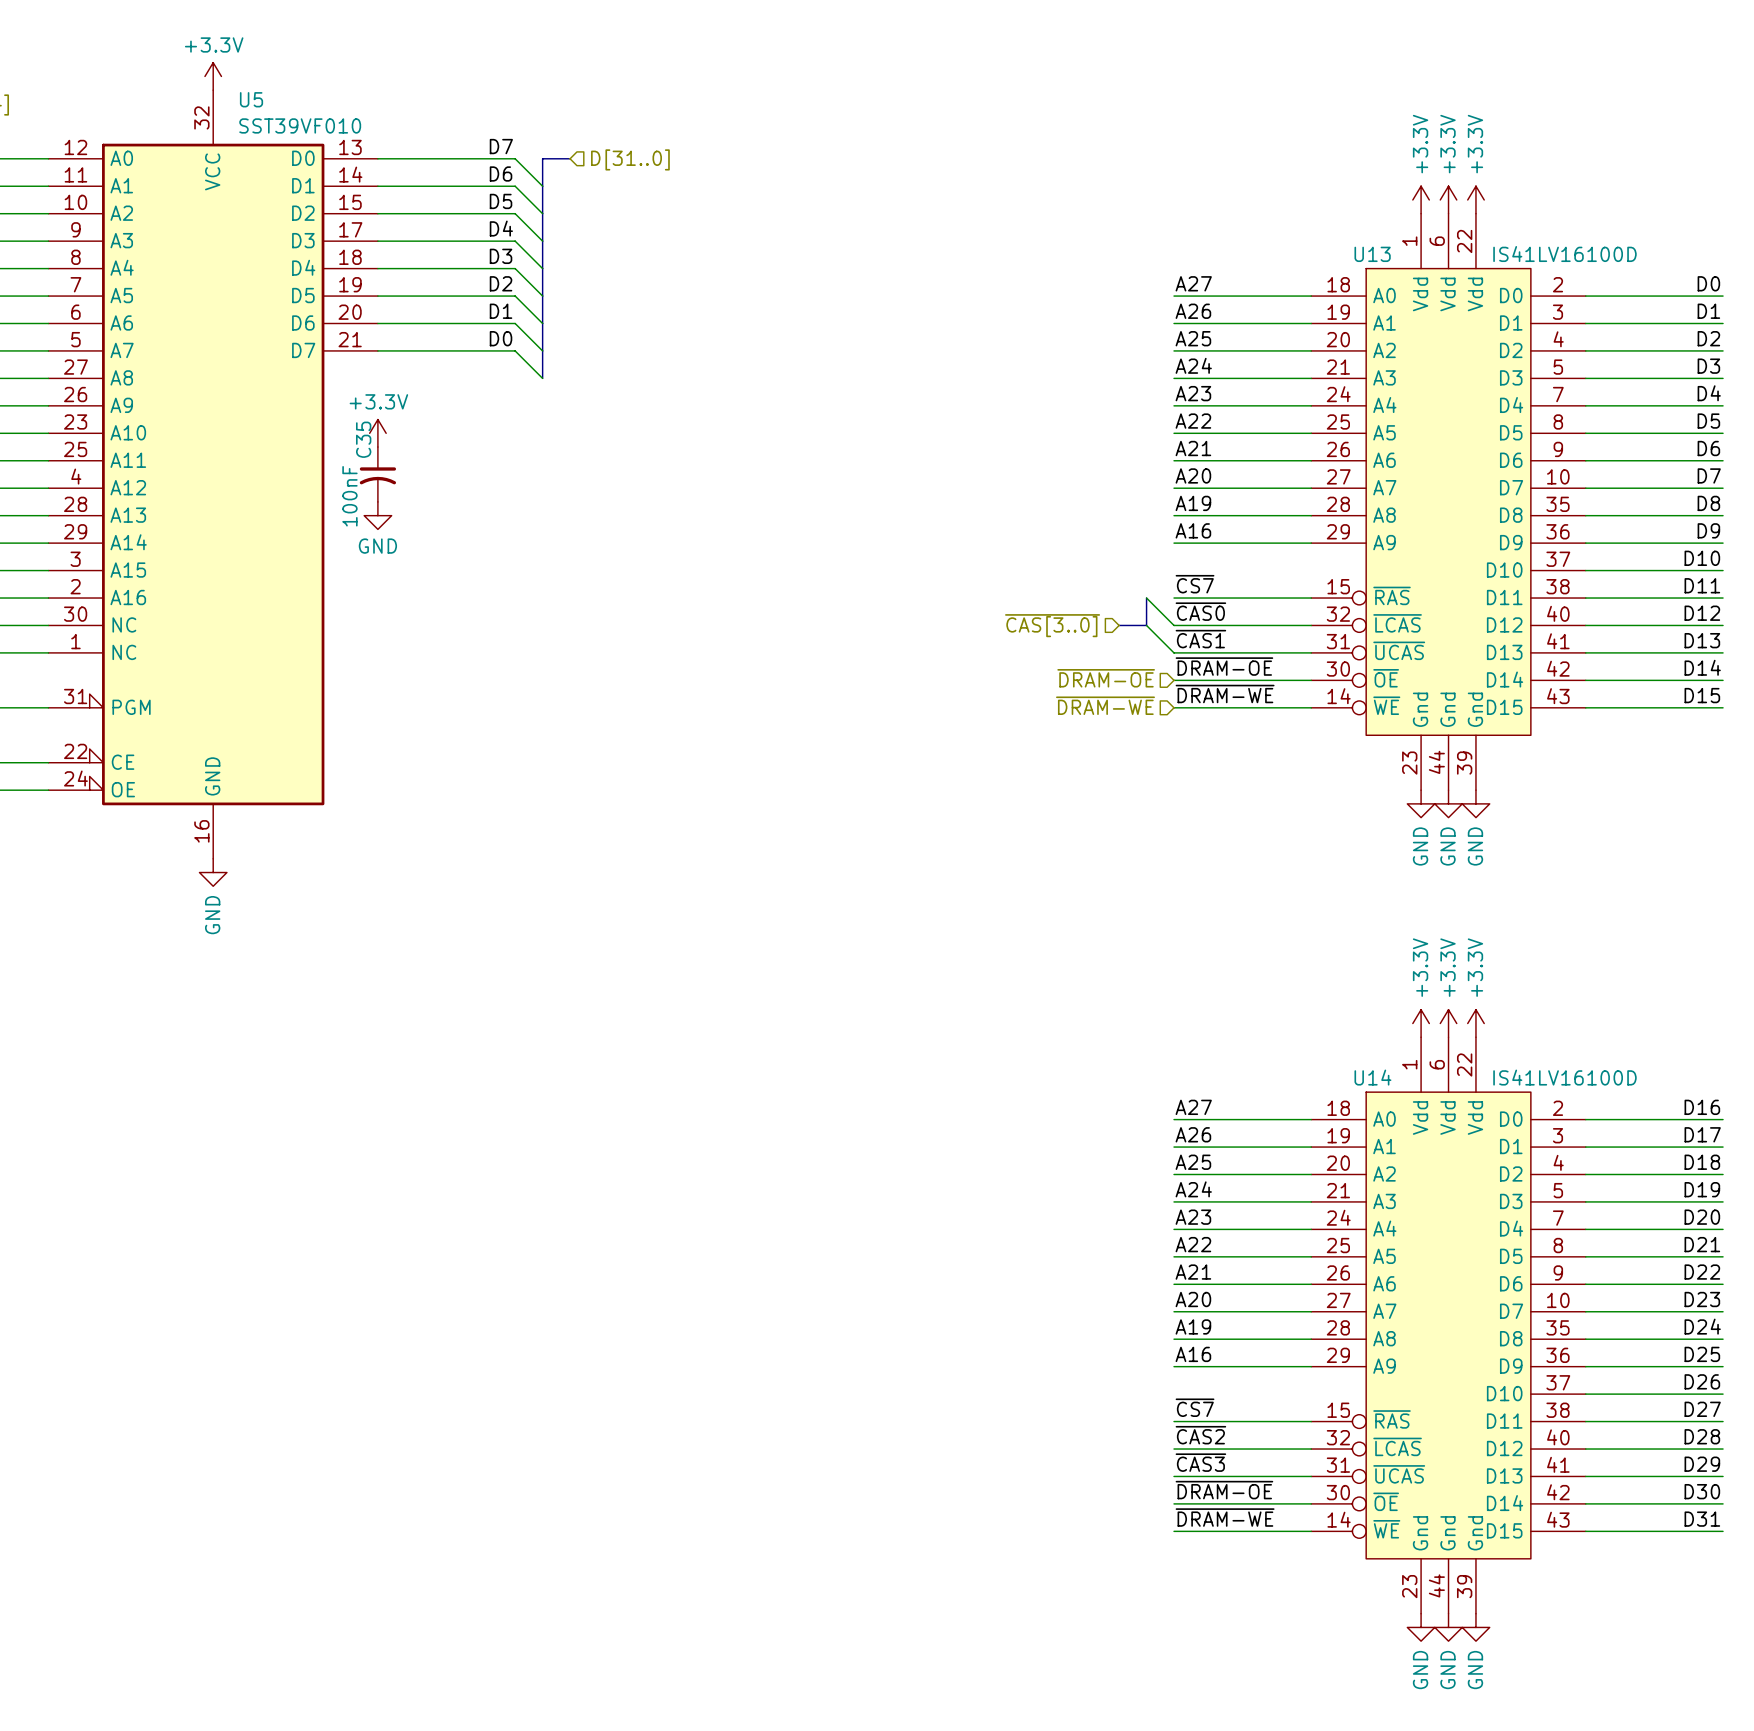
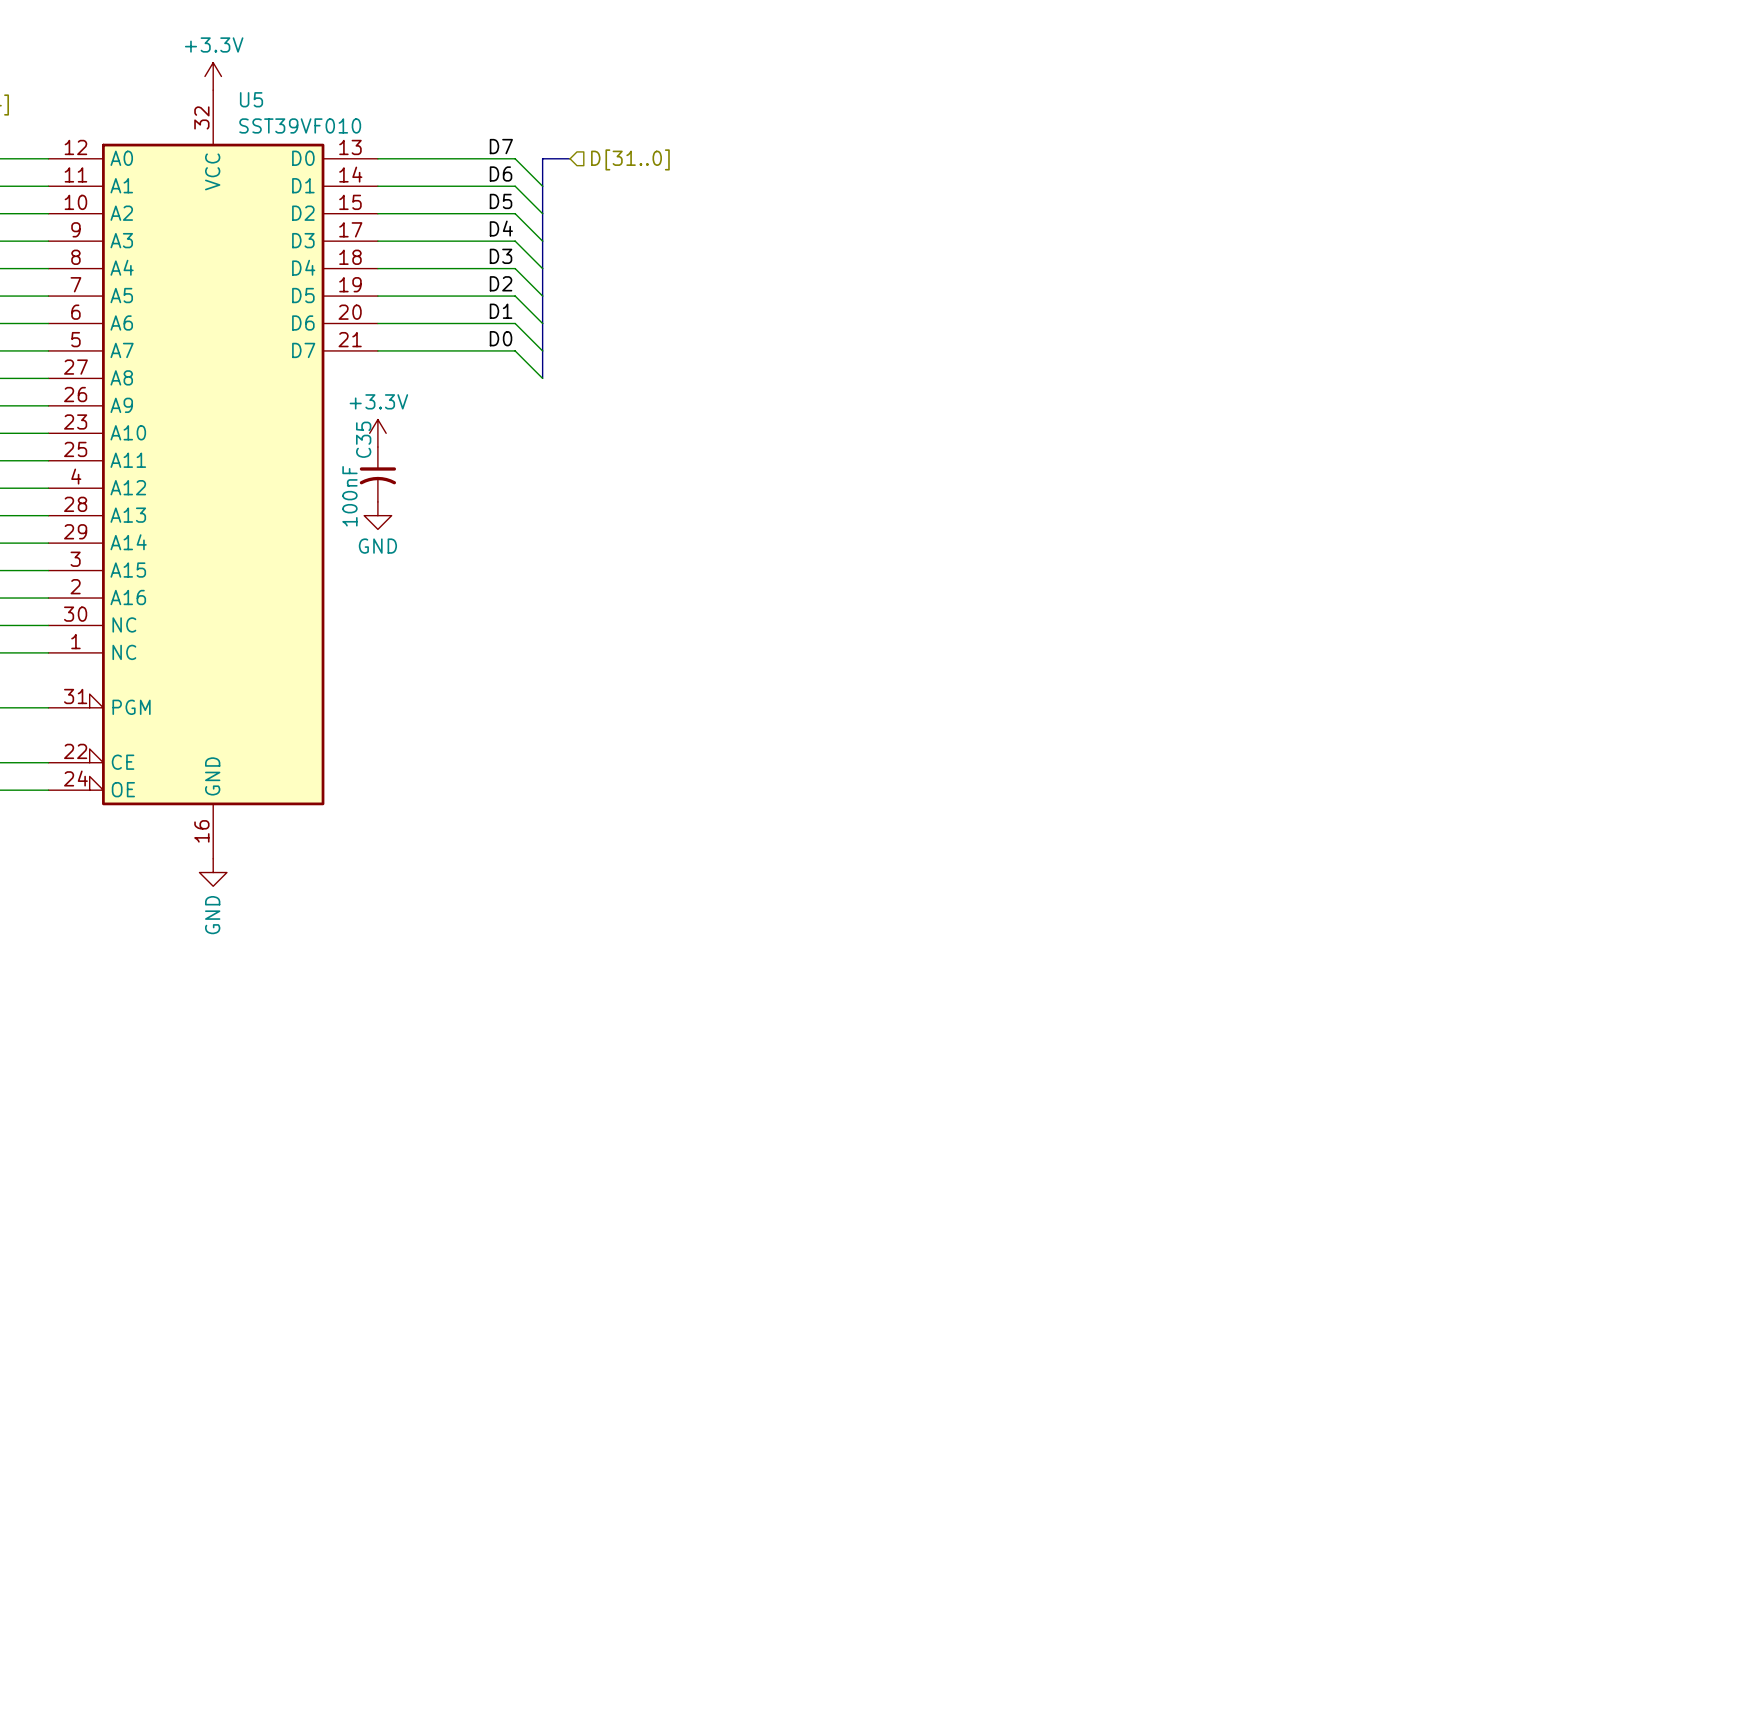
power symbol: +3.3V (1421, 199) -> none
power symbol: +3.3V (1448, 199) -> none
power symbol: +3.3V (1475, 199) -> none
label: A27 (1193, 283) -> none
label: D0 (1708, 283) -> none
wire: (1174, 296) (1311, 296) -> none
wire: (1585, 296) (1723, 296) -> none
label: A26 (1193, 311) -> none
label: D1 (1708, 311) -> none
wire: (1174, 323) (1311, 323) -> none
wire: (1585, 323) (1723, 323) -> none
label: A25 (1193, 338) -> none
label: D2 (1708, 338) -> none
wire: (1174, 350) (1311, 350) -> none
wire: (1585, 350) (1723, 350) -> none
label: A24 (1193, 365) -> none
label: D3 (1708, 366) -> none
wire: (1174, 378) (1311, 378) -> none
wire: (1585, 378) (1723, 378) -> none
label: A23 (1193, 393) -> none
label: D4 (1709, 393) -> none
wire: (1174, 405) (1311, 405) -> none
wire: (1585, 405) (1723, 405) -> none
label: A22 (1193, 421) -> none
label: D5 (1708, 421) -> none
wire: (1174, 433) (1311, 433) -> none
wire: (1585, 433) (1723, 433) -> none
label: A21 (1193, 448) -> none
label: D6 (1708, 448) -> none
wire: (1174, 460) (1311, 460) -> none
wire: (1585, 460) (1723, 460) -> none
label: A20 (1193, 475) -> none
label: D7 (1709, 475) -> none
wire: (1174, 488) (1311, 488) -> none
wire: (1585, 488) (1723, 488) -> none
U13: IS41LV16100D (1448, 501) -> none
label: A19 (1193, 503) -> none
label: D8 (1708, 503) -> none
wire: (1174, 515) (1311, 515) -> none
wire: (1585, 515) (1723, 515) -> none
label: A16 (1193, 530) -> none
label: D9 (1708, 530) -> none
wire: (1174, 543) (1311, 543) -> none
wire: (1585, 543) (1723, 543) -> none
label: D10 (1702, 558) -> none
wire: (1585, 570) (1723, 570) -> none
label: ~{CS7} (1195, 584) -> none
label: D11 (1702, 585) -> none
wire: (1146, 598) (1174, 625) (1311, 625) -> none
bus: (1146, 598) (1146, 625) (1119, 625) -> none
wire: (1174, 598) (1311, 598) -> none
wire: (1585, 598) (1723, 598) -> none
label: ~{CAS0} (1200, 611) -> none
label: D12 (1702, 613) -> none
hierarchical label: ~{CAS[3..0]} (1052, 625) -> none
wire: (1146, 625) (1174, 652) (1311, 652) -> none
wire: (1585, 625) (1723, 625) -> none
label: ~{CAS1} (1200, 639) -> none
label: D13 (1702, 640) -> none
wire: (1585, 652) (1723, 652) -> none
label: ~{DRAM-OE} (1224, 666) -> none
label: D14 (1702, 667) -> none
hierarchical label: ~{DRAM-OE} (1106, 678) -> none
wire: (1174, 680) (1311, 680) -> none
wire: (1585, 680) (1723, 680) -> none
label: ~{DRAM-WE} (1225, 693) -> none
label: D15 (1702, 695) -> none
hierarchical label: ~{DRAM-WE} (1105, 705) -> none
wire: (1174, 707) (1311, 707) -> none
wire: (1585, 707) (1723, 707) -> none
power symbol: GND (1421, 803) -> none
power symbol: GND (1448, 803) -> none
power symbol: GND (1475, 803) -> none
power symbol: +3.3V (1421, 1023) -> none
power symbol: +3.3V (1448, 1023) -> none
power symbol: +3.3V (1475, 1023) -> none
label: A27 (1193, 1107) -> none
label: D16 (1702, 1107) -> none
wire: (1174, 1119) (1311, 1119) -> none
wire: (1585, 1119) (1723, 1119) -> none
label: A26 (1193, 1134) -> none
label: D17 (1702, 1134) -> none
wire: (1174, 1147) (1311, 1147) -> none
wire: (1585, 1147) (1723, 1147) -> none
label: A25 (1193, 1162) -> none
label: D18 (1702, 1162) -> none
wire: (1174, 1174) (1311, 1174) -> none
wire: (1585, 1174) (1723, 1174) -> none
label: A24 (1193, 1189) -> none
label: D19 (1702, 1189) -> none
wire: (1174, 1201) (1311, 1201) -> none
wire: (1585, 1201) (1723, 1201) -> none
label: A23 (1193, 1217) -> none
label: D20 (1702, 1217) -> none
wire: (1174, 1229) (1311, 1229) -> none
wire: (1585, 1229) (1723, 1229) -> none
label: A22 (1193, 1244) -> none
label: D21 (1702, 1244) -> none
wire: (1174, 1256) (1311, 1256) -> none
wire: (1585, 1256) (1723, 1256) -> none
label: A21 (1193, 1272) -> none
label: D22 (1702, 1272) -> none
wire: (1174, 1284) (1311, 1284) -> none
wire: (1585, 1284) (1723, 1284) -> none
label: A20 (1193, 1299) -> none
label: D23 (1702, 1299) -> none
wire: (1174, 1311) (1311, 1311) -> none
wire: (1585, 1311) (1723, 1311) -> none
U14: IS41LV16100D (1448, 1325) -> none
label: A19 (1193, 1326) -> none
label: D24 (1702, 1326) -> none
wire: (1174, 1339) (1311, 1339) -> none
wire: (1585, 1339) (1723, 1339) -> none
label: A16 (1193, 1354) -> none
label: D25 (1702, 1354) -> none
wire: (1174, 1366) (1311, 1366) -> none
wire: (1585, 1366) (1723, 1366) -> none
label: D26 (1702, 1381) -> none
wire: (1585, 1394) (1723, 1394) -> none
label: ~{CS7} (1195, 1407) -> none
label: D27 (1702, 1409) -> none
wire: (1174, 1421) (1311, 1421) -> none
wire: (1585, 1421) (1723, 1421) -> none
label: ~{CAS2} (1200, 1435) -> none
label: D28 (1702, 1436) -> none
wire: (1174, 1449) (1311, 1449) -> none
wire: (1585, 1449) (1723, 1449) -> none
label: ~{CAS3} (1200, 1462) -> none
label: D29 (1702, 1464) -> none
wire: (1174, 1476) (1311, 1476) -> none
wire: (1585, 1476) (1723, 1476) -> none
label: ~{DRAM-OE} (1224, 1490) -> none
label: D30 (1702, 1491) -> none
wire: (1174, 1503) (1311, 1503) -> none
wire: (1585, 1503) (1723, 1503) -> none
label: ~{DRAM-WE} (1225, 1517) -> none
label: D31 (1702, 1519) -> none
wire: (1174, 1531) (1311, 1531) -> none
wire: (1585, 1531) (1723, 1531) -> none
power symbol: GND (1421, 1627) -> none
power symbol: GND (1448, 1627) -> none
power symbol: GND (1475, 1627) -> none

